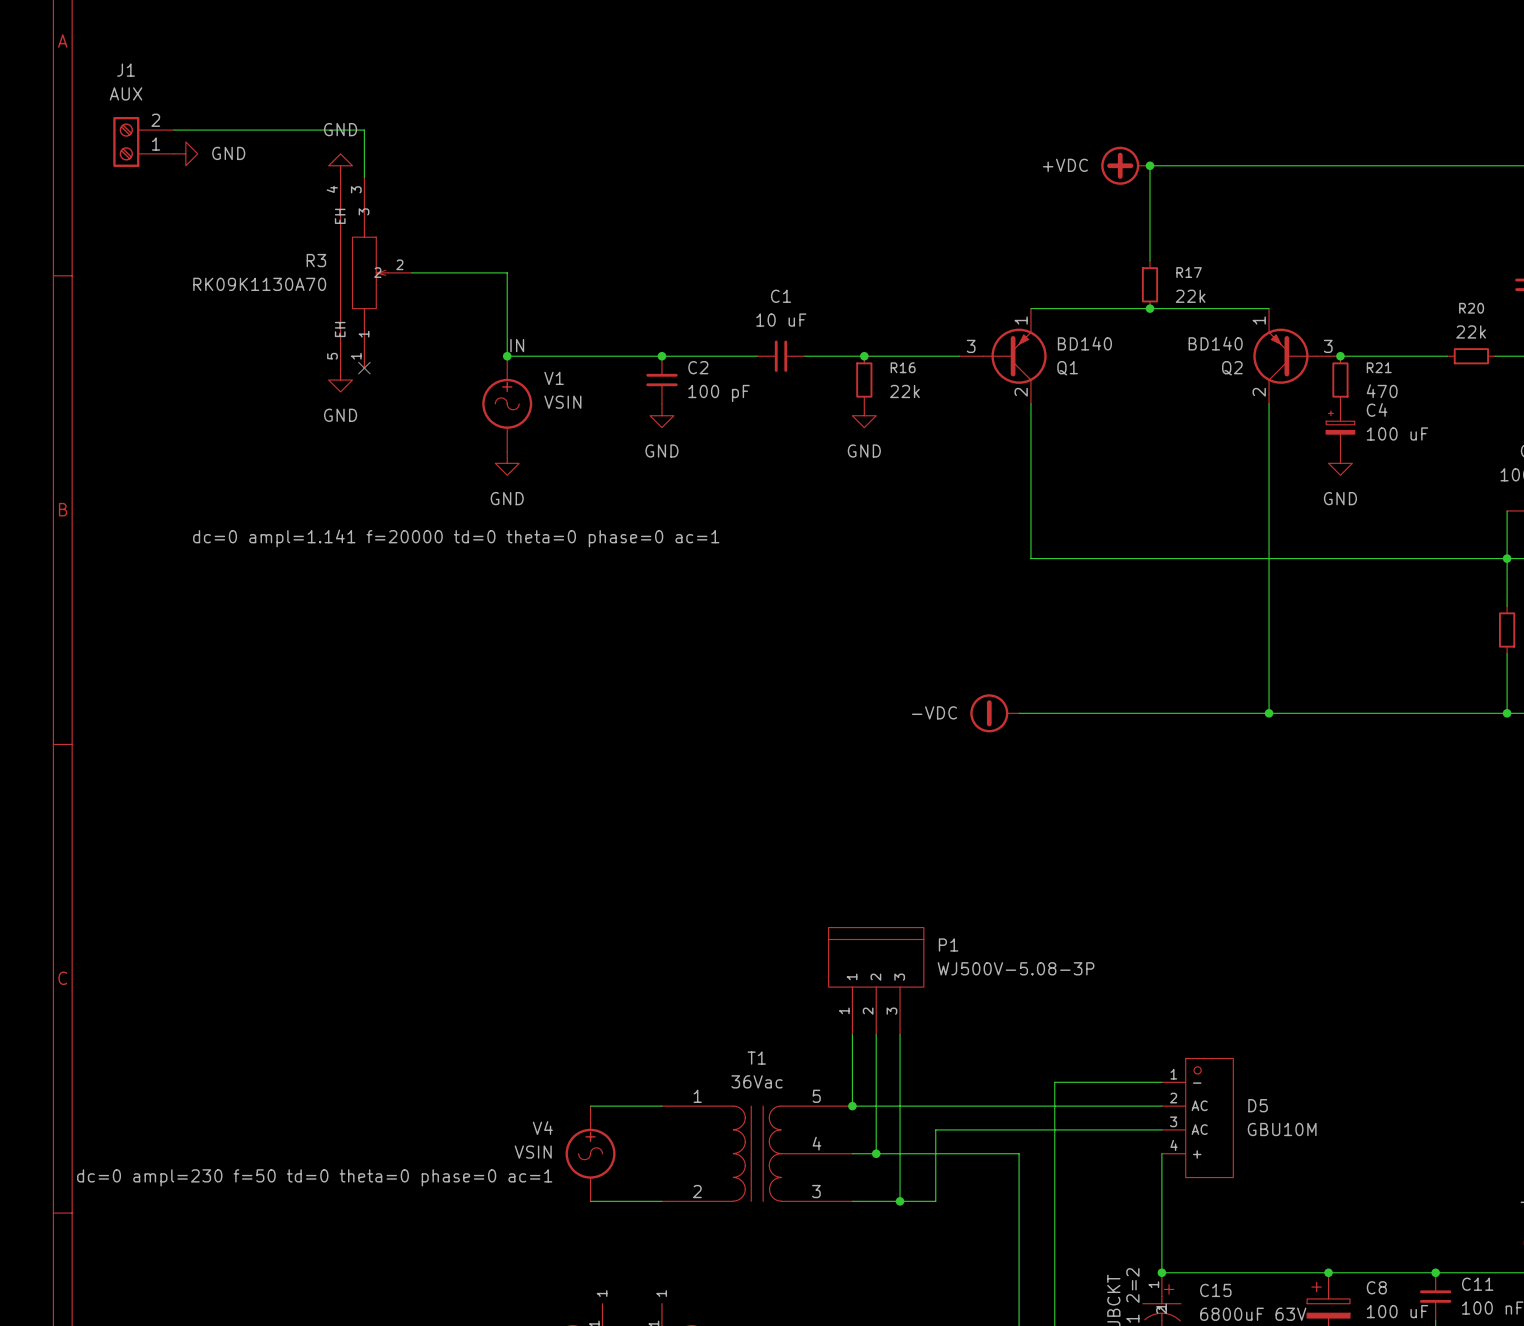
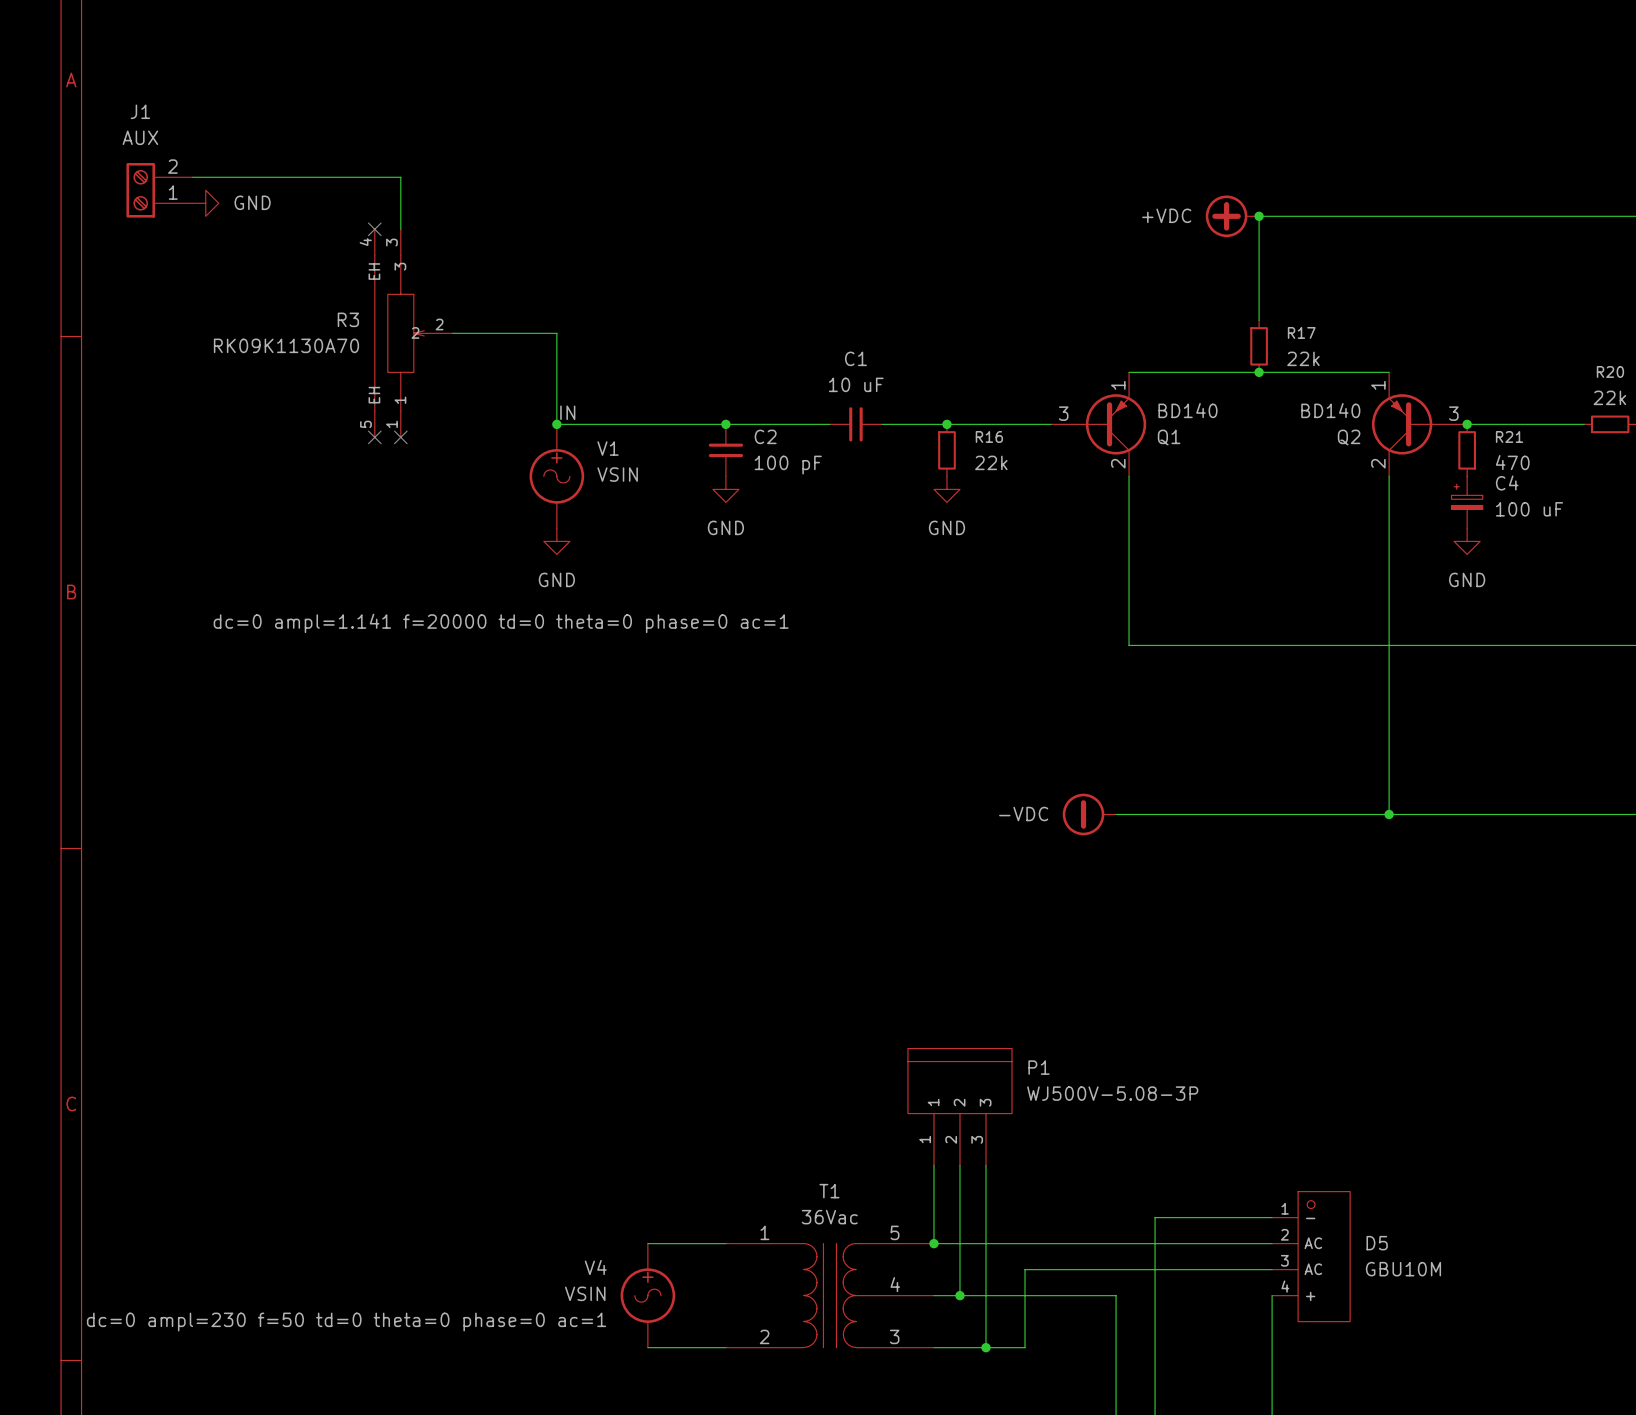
power symbol: GND (340, 165) -> none
no-connect mark: none -> (374, 229)
no-connect mark: none -> (374, 437)
power symbol: GND (340, 380) -> none

